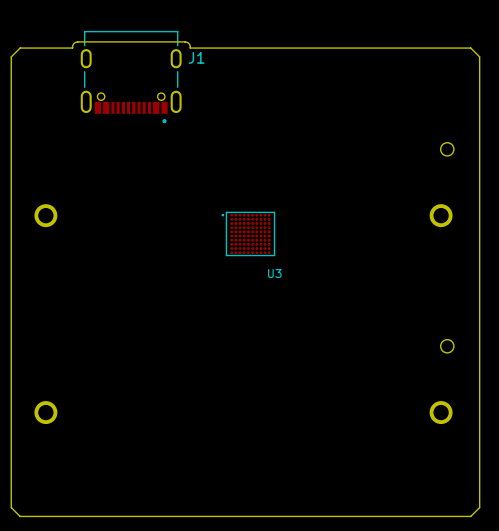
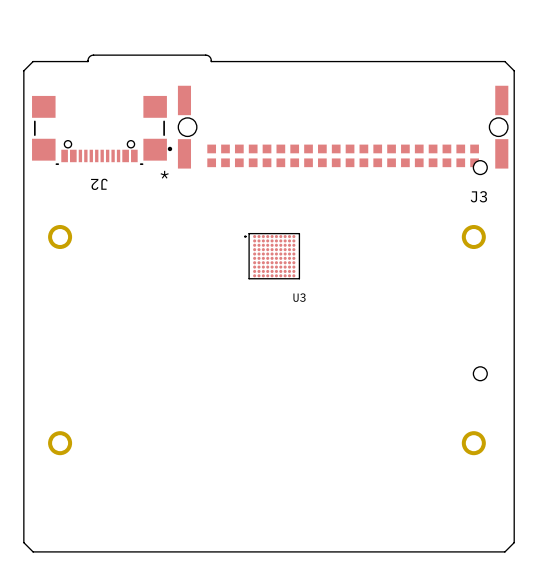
J1: (131, 77) -> none
J3: none -> (338, 127)
J2: none -> (99, 130)

